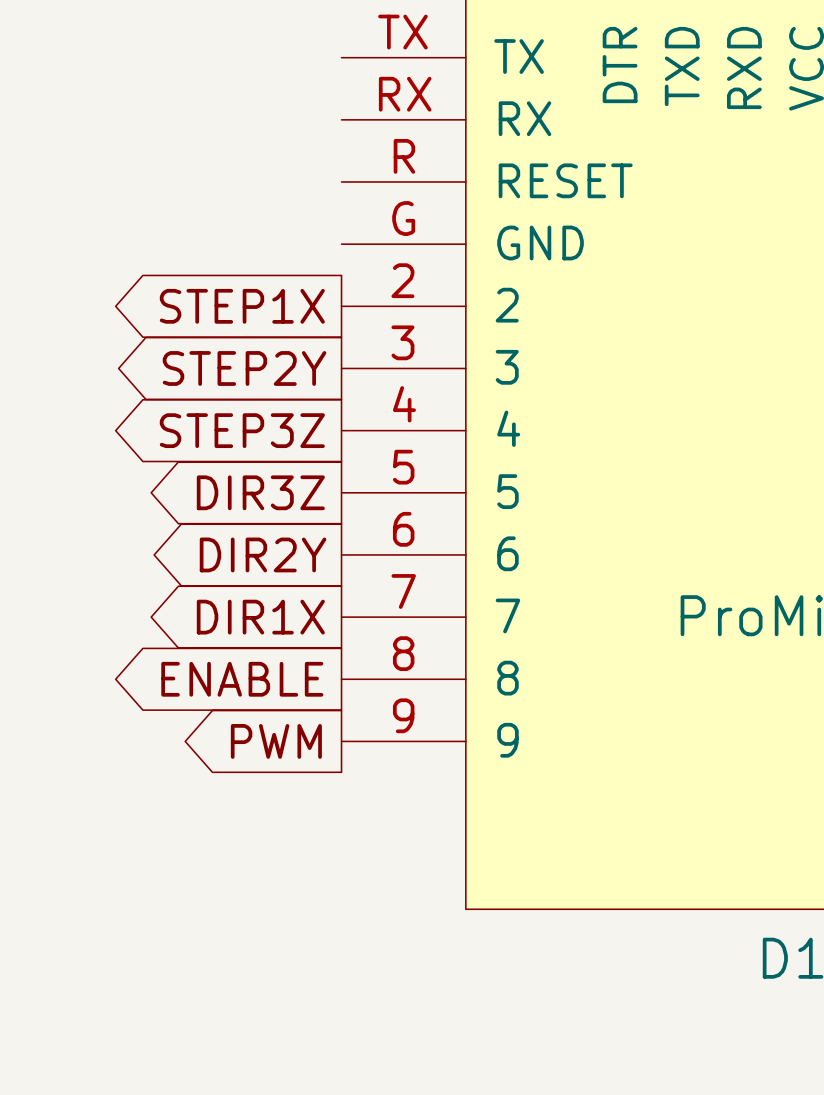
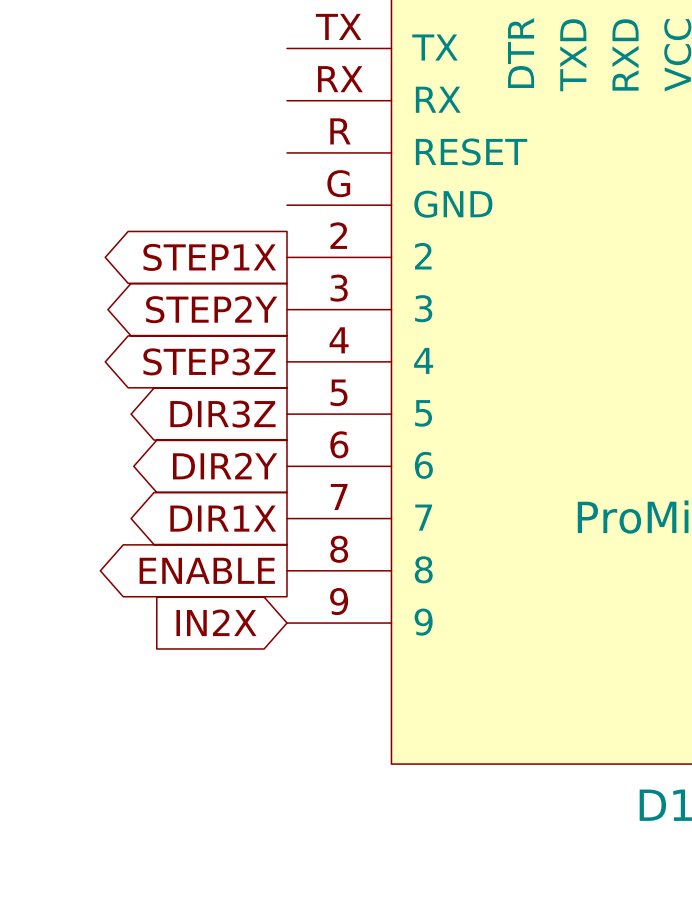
global label shape: output (276, 741) -> input (216, 622)
global label: PWM (276, 741) -> IN2X (216, 622)

